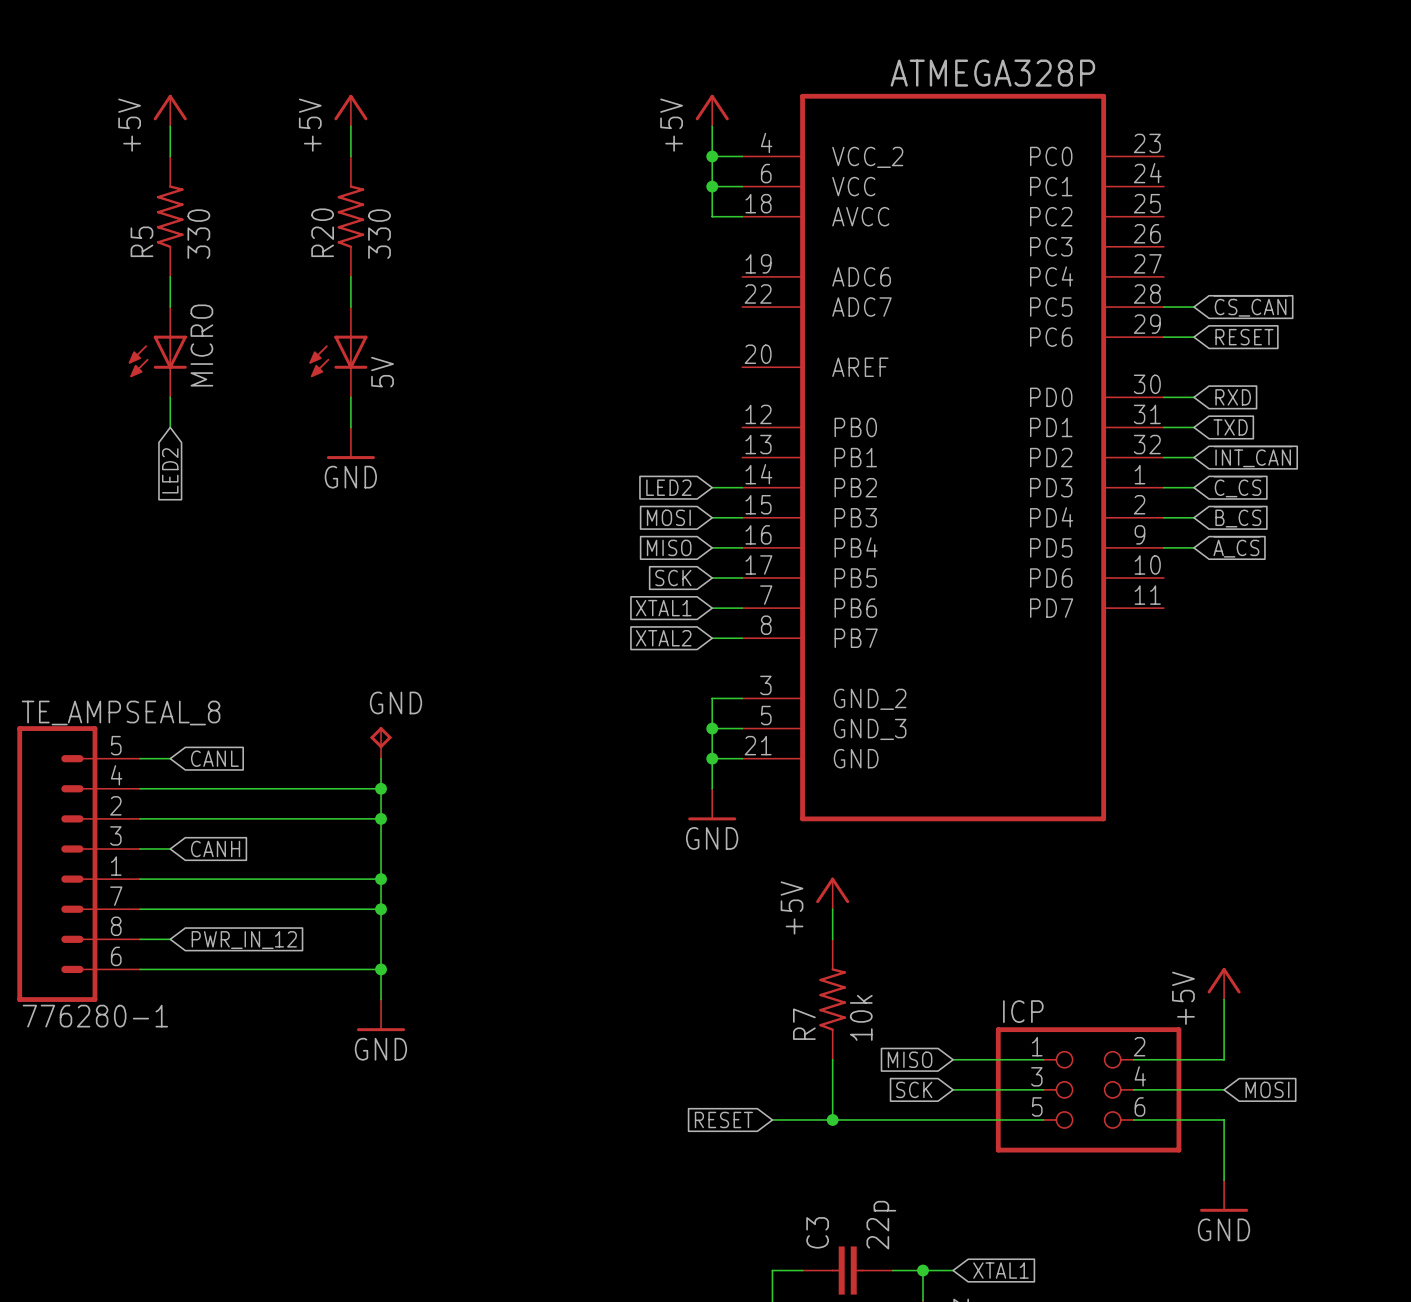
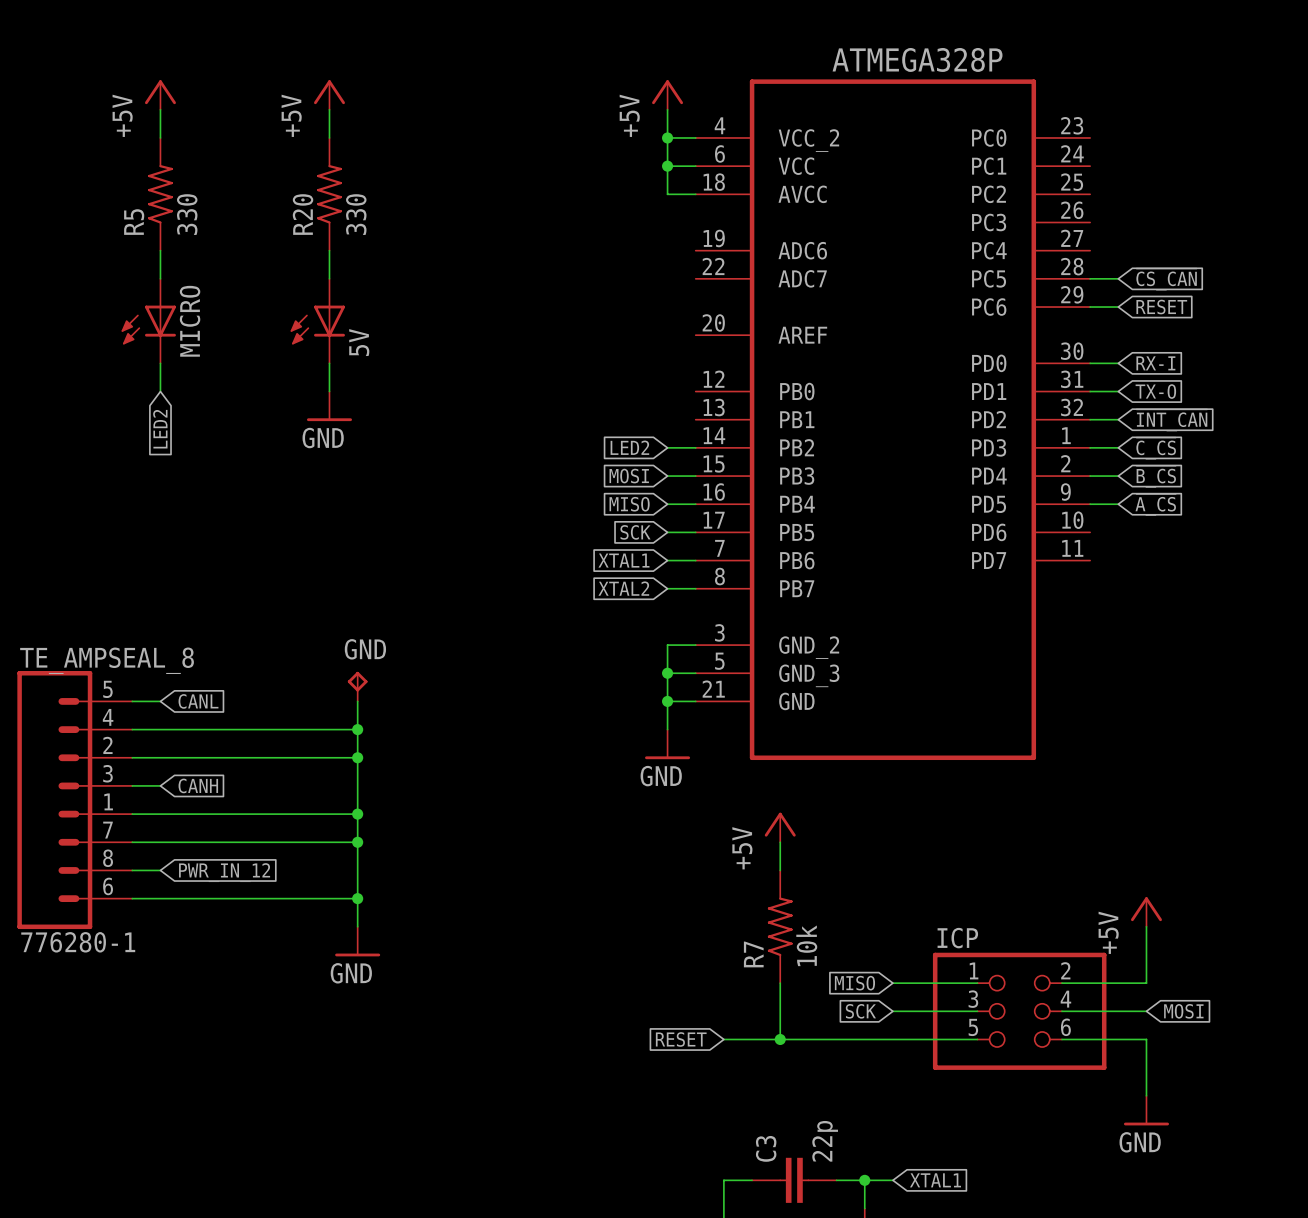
global label: RXD (1233, 397) -> RX-I (1155, 363)
global label: TXD (1230, 427) -> TX-O (1155, 391)

